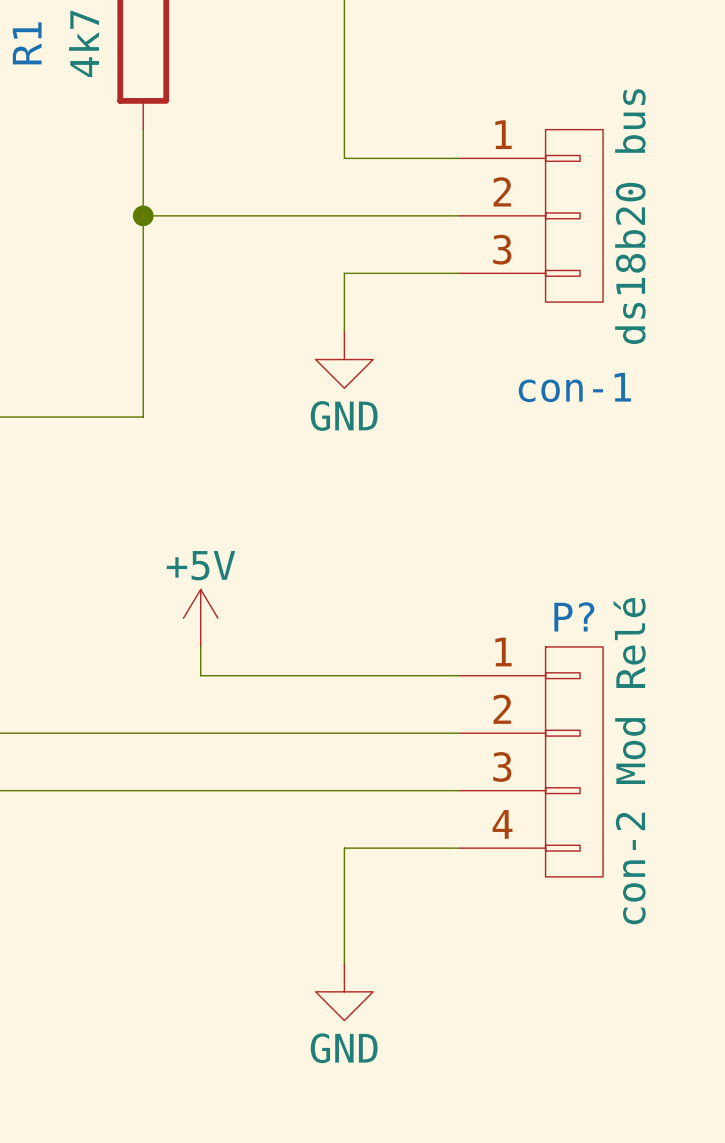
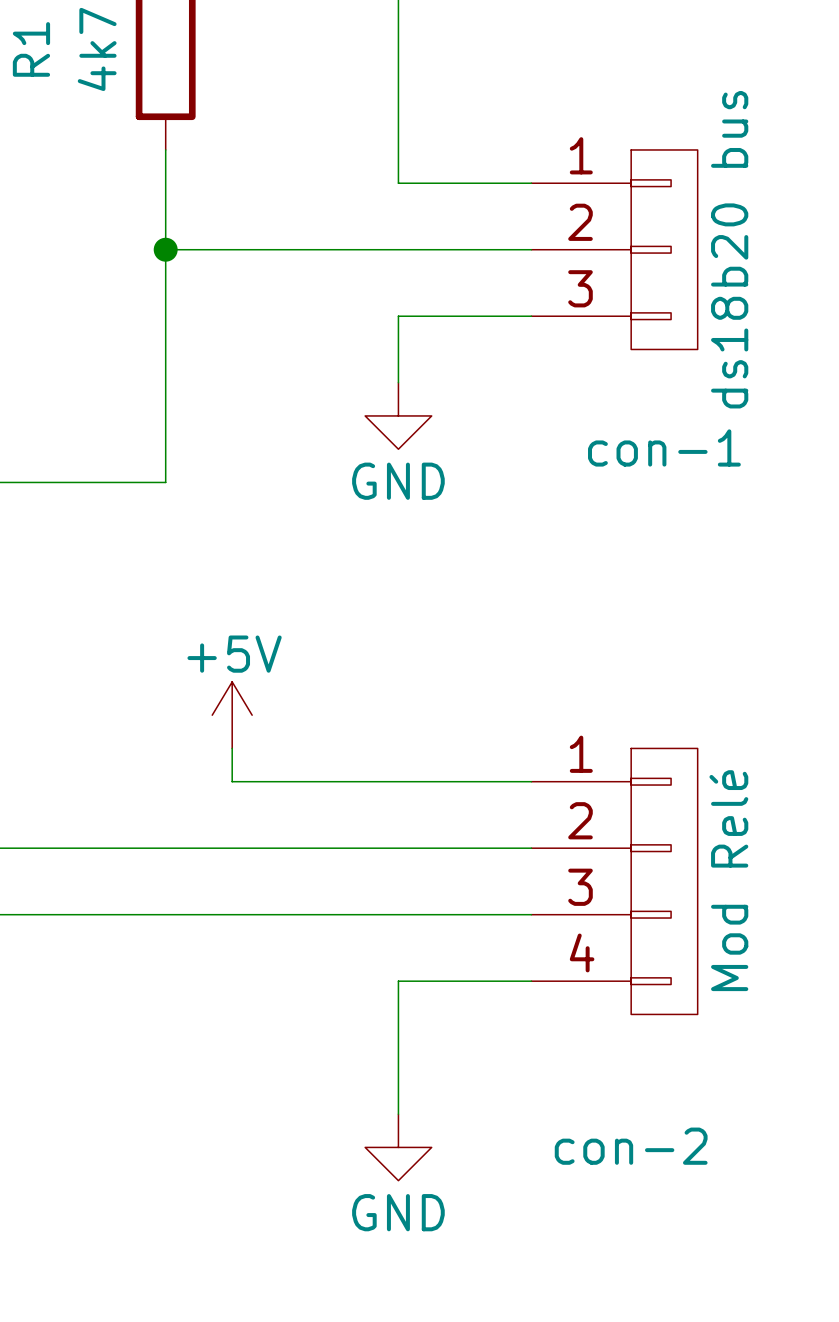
P? name: P? (574, 616) -> con-2 (631, 1146)
P? value: con-2 Mod Relé (629, 761) -> Mod Relé (728, 880)

